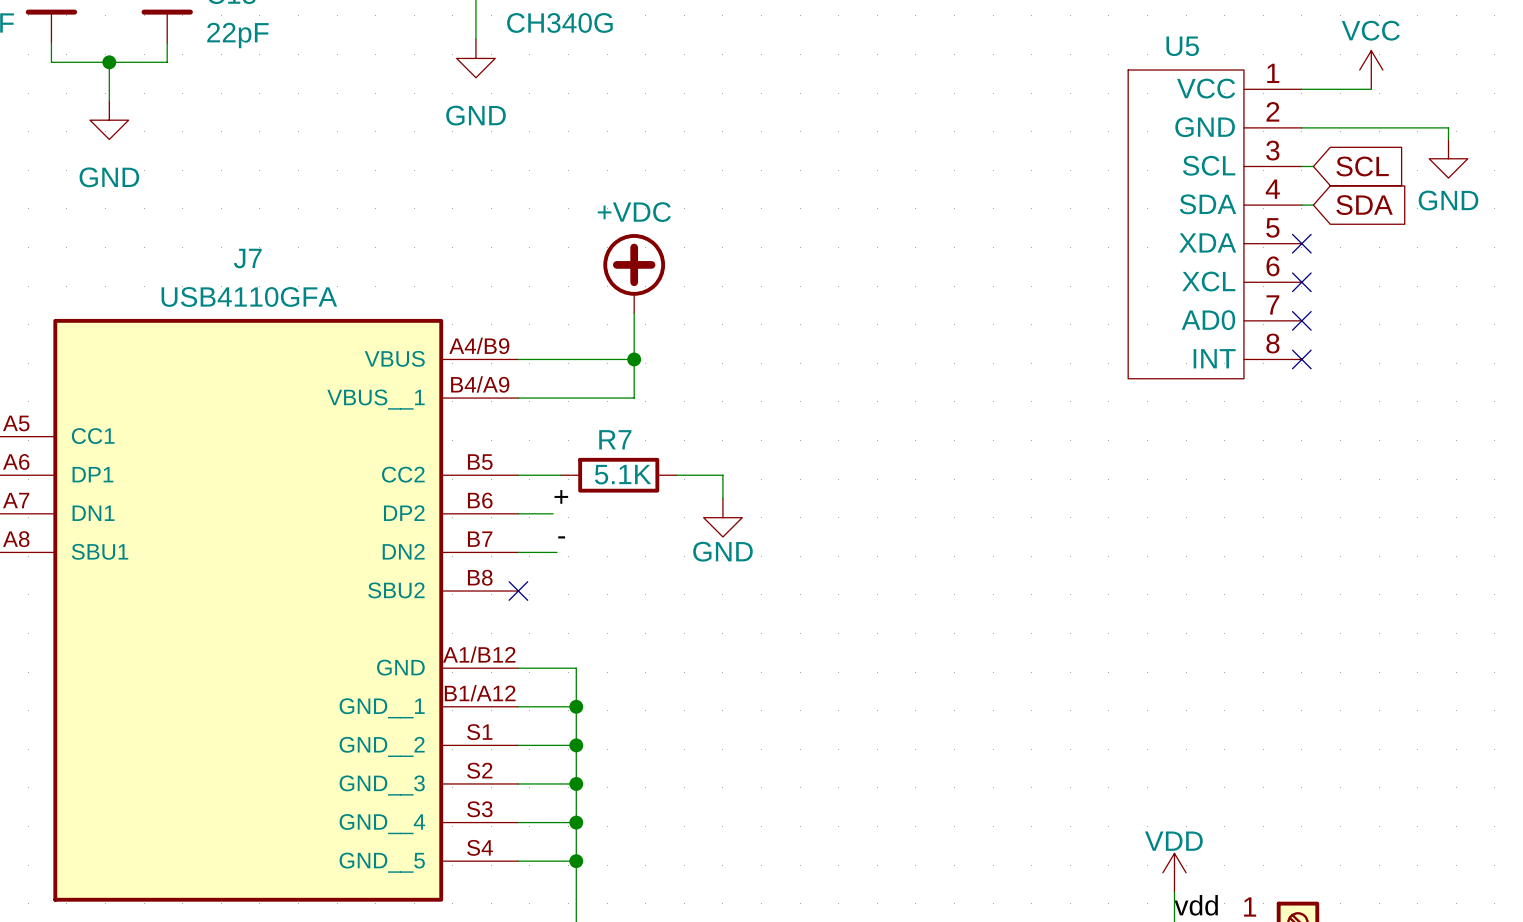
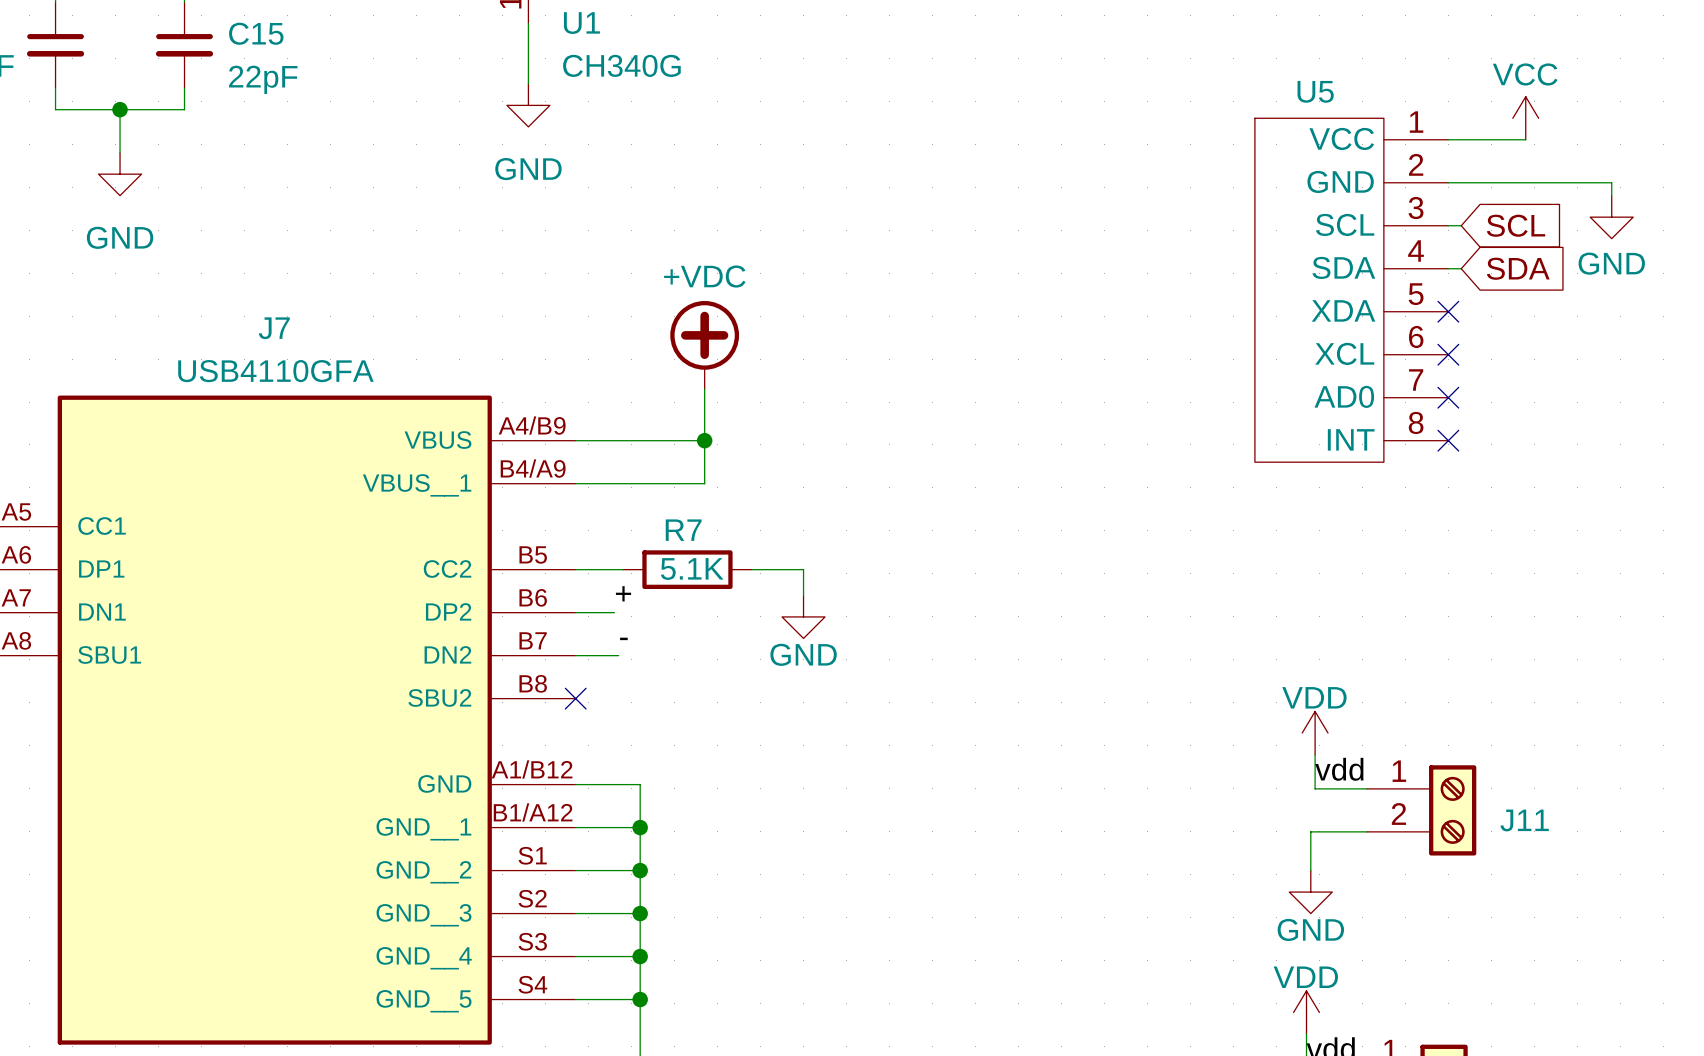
power symbol: none -> VDD (1315, 733)
wire: none -> (1315, 754) (1315, 788) (1366, 788)
label: none -> vdd (1339, 769)
J11: none -> (1421, 810)
wire: none -> (1366, 831) (1310, 831) (1310, 870)
power symbol: none -> GND (1310, 892)

